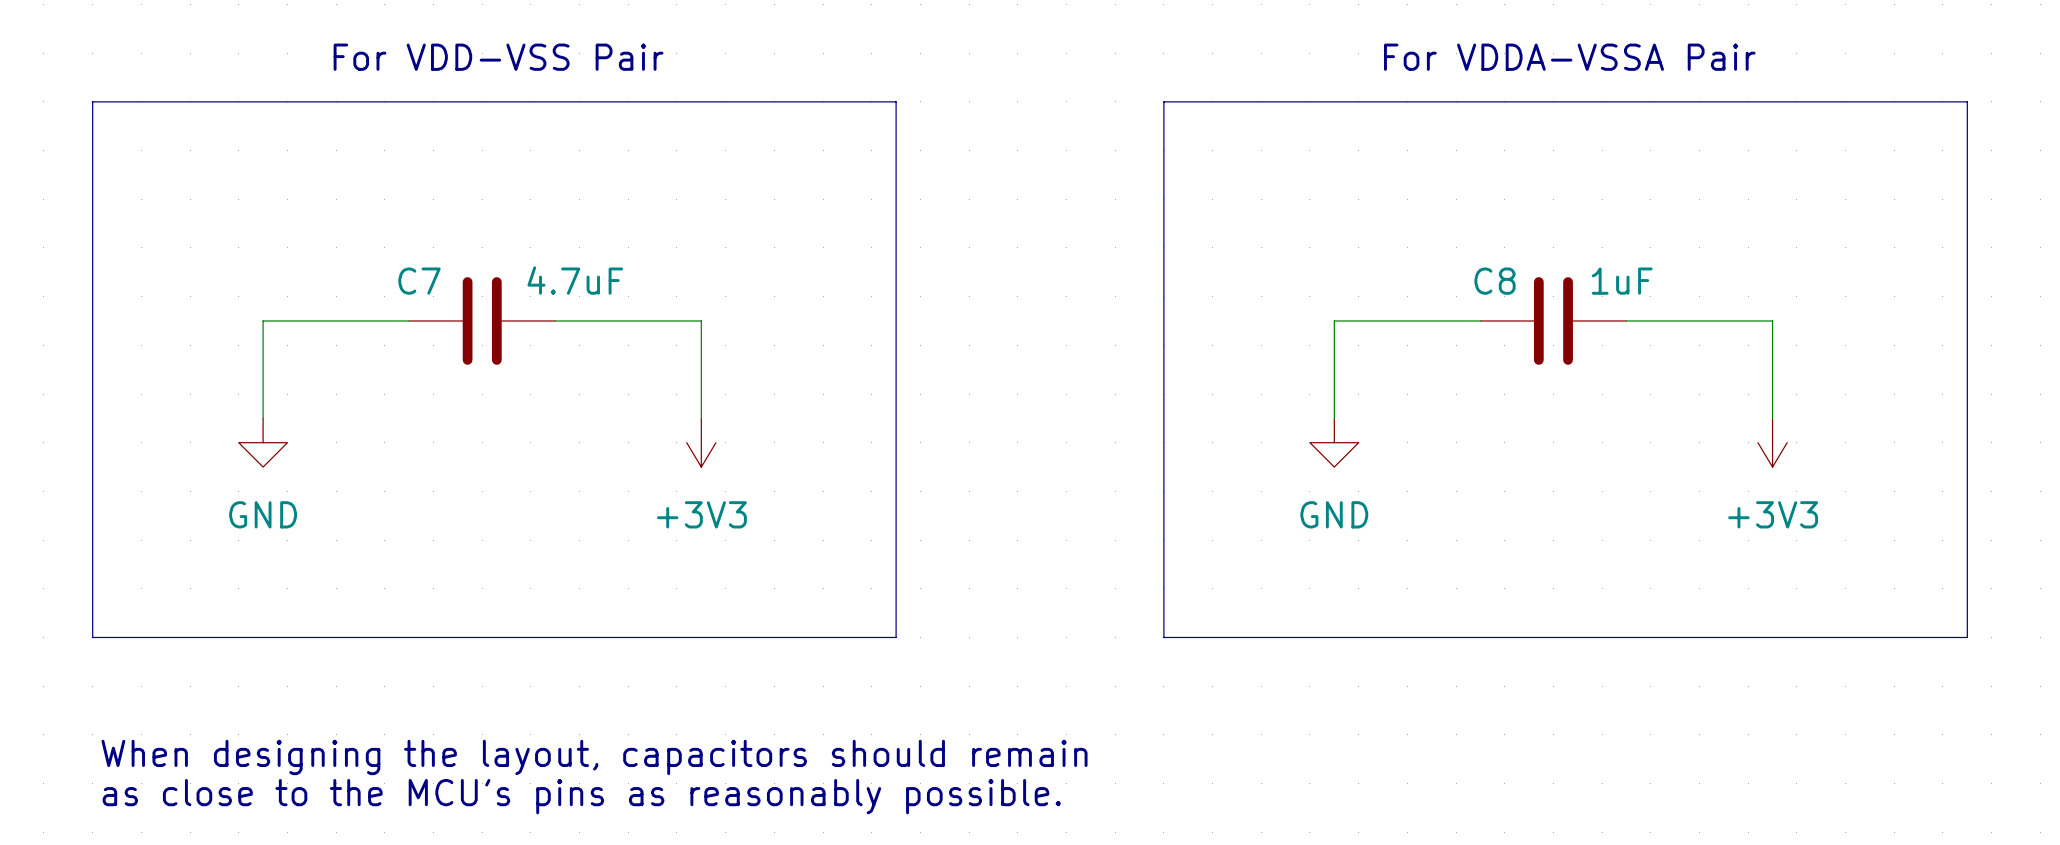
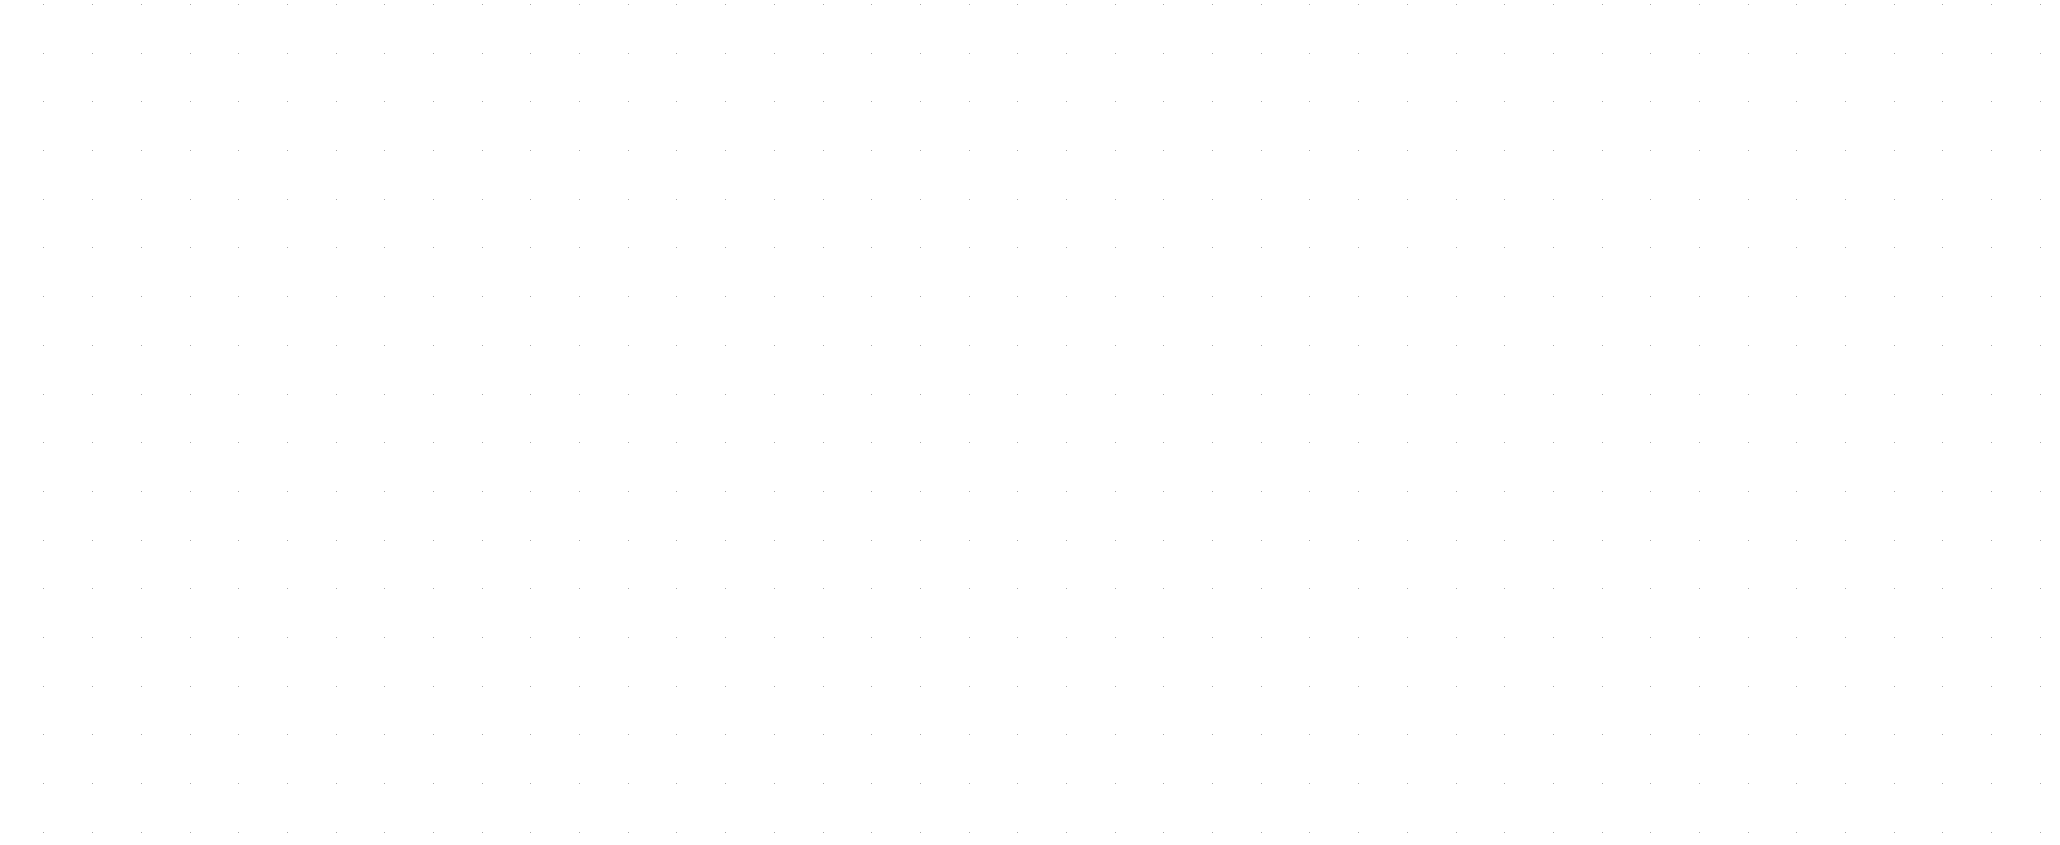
text: For VDD-VSS Pair (498, 57) -> none
text: For VDDA-VSSA Pair (1569, 57) -> none
line: (92, 101) (896, 101) (896, 637) (92, 637) (92, 101) -> none
line: (1163, 101) (1967, 101) (1967, 637) (1163, 637) (1163, 101) -> none
wire: (409, 320) (263, 320) (263, 418) -> none
C7: 4.7uF (482, 320) -> none
wire: (555, 320) (701, 320) (701, 418) -> none
wire: (1480, 320) (1334, 320) (1334, 418) -> none
C8: 1uF (1553, 320) -> none
wire: (1626, 320) (1772, 320) (1772, 418) -> none
power symbol: GND (263, 442) -> none
power symbol: +3V3 (701, 442) -> none
power symbol: GND (1334, 442) -> none
power symbol: +3V3 (1772, 442) -> none
text: When designing the layout, capacitors should remain (594, 757) -> none
text: as close to the MCU's pins as reasonably possible. (581, 796) -> none

